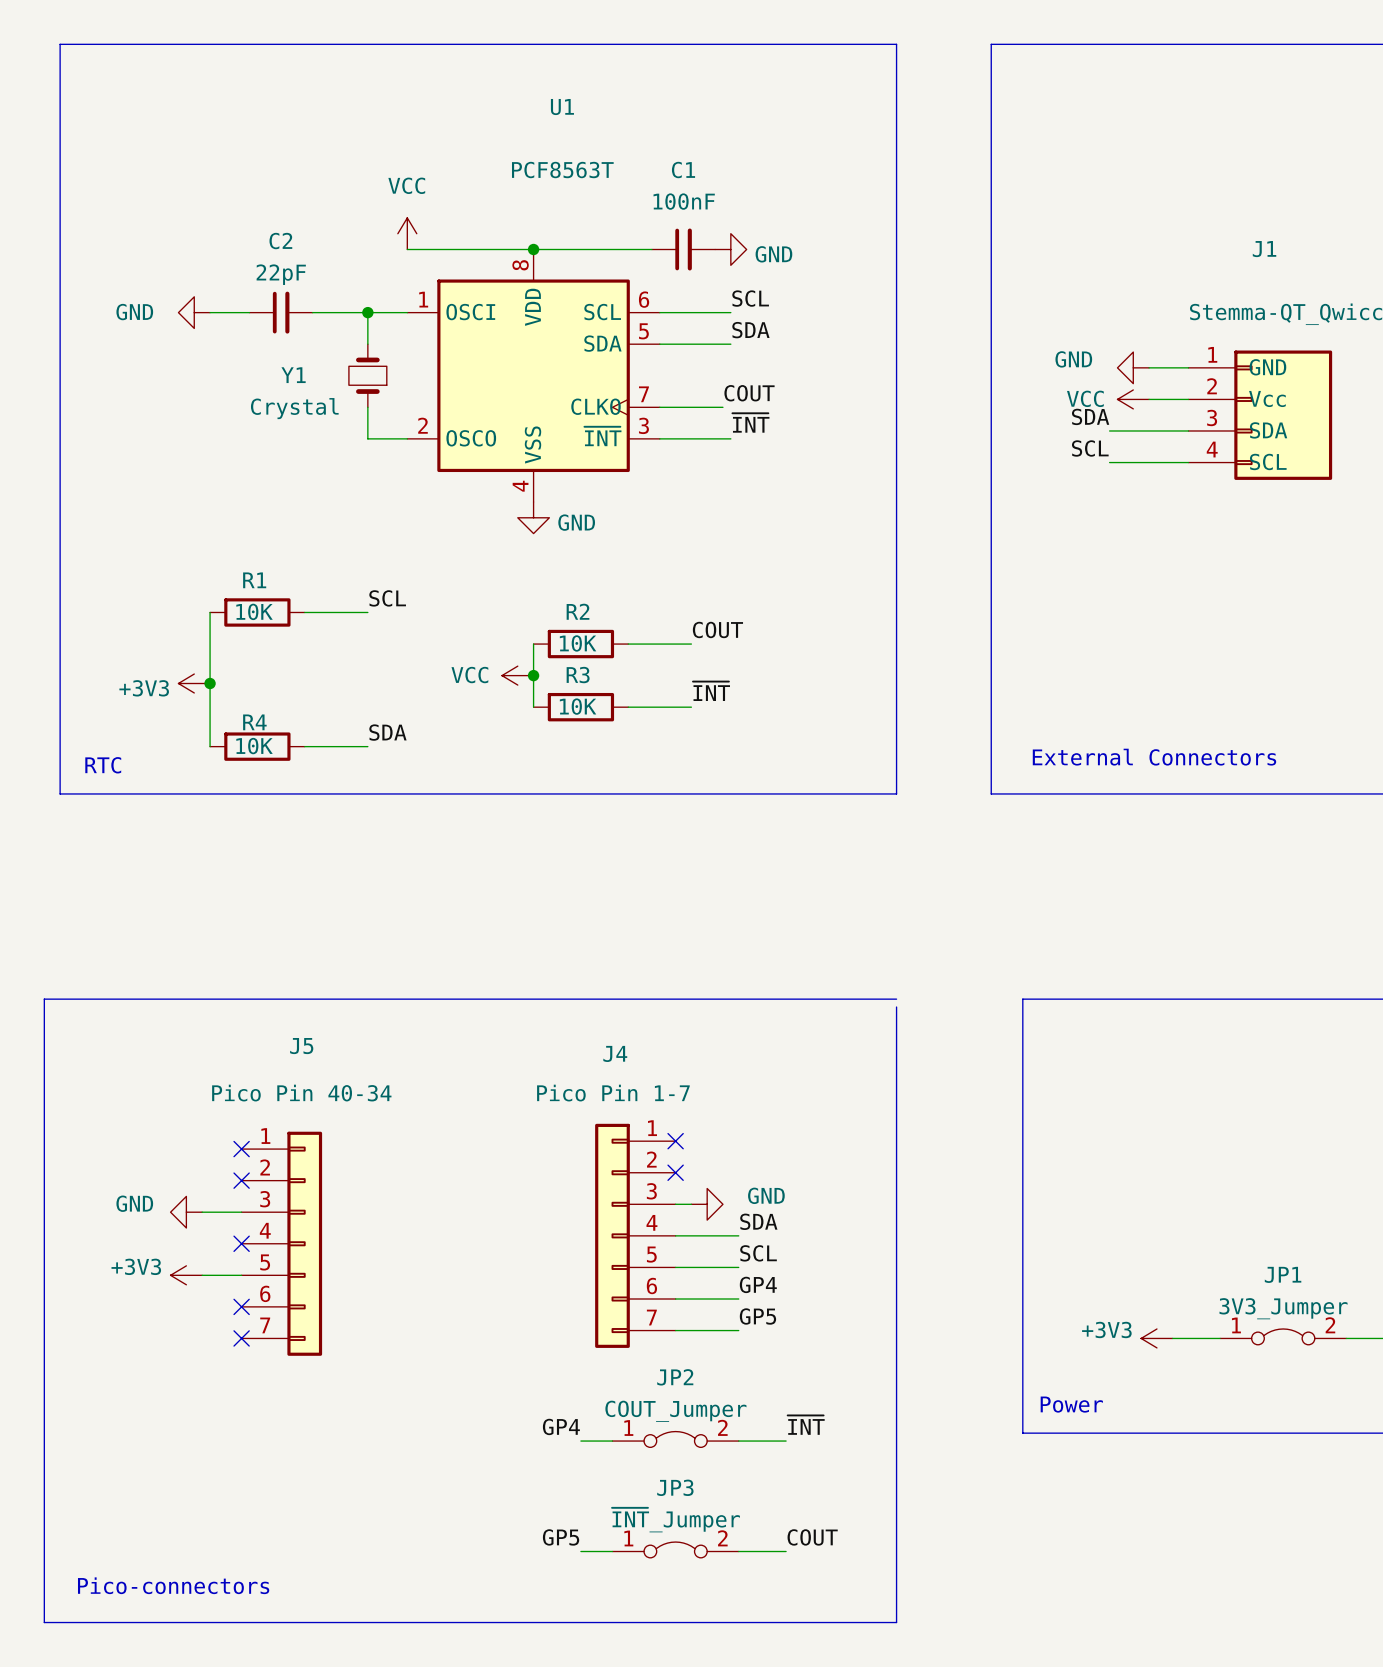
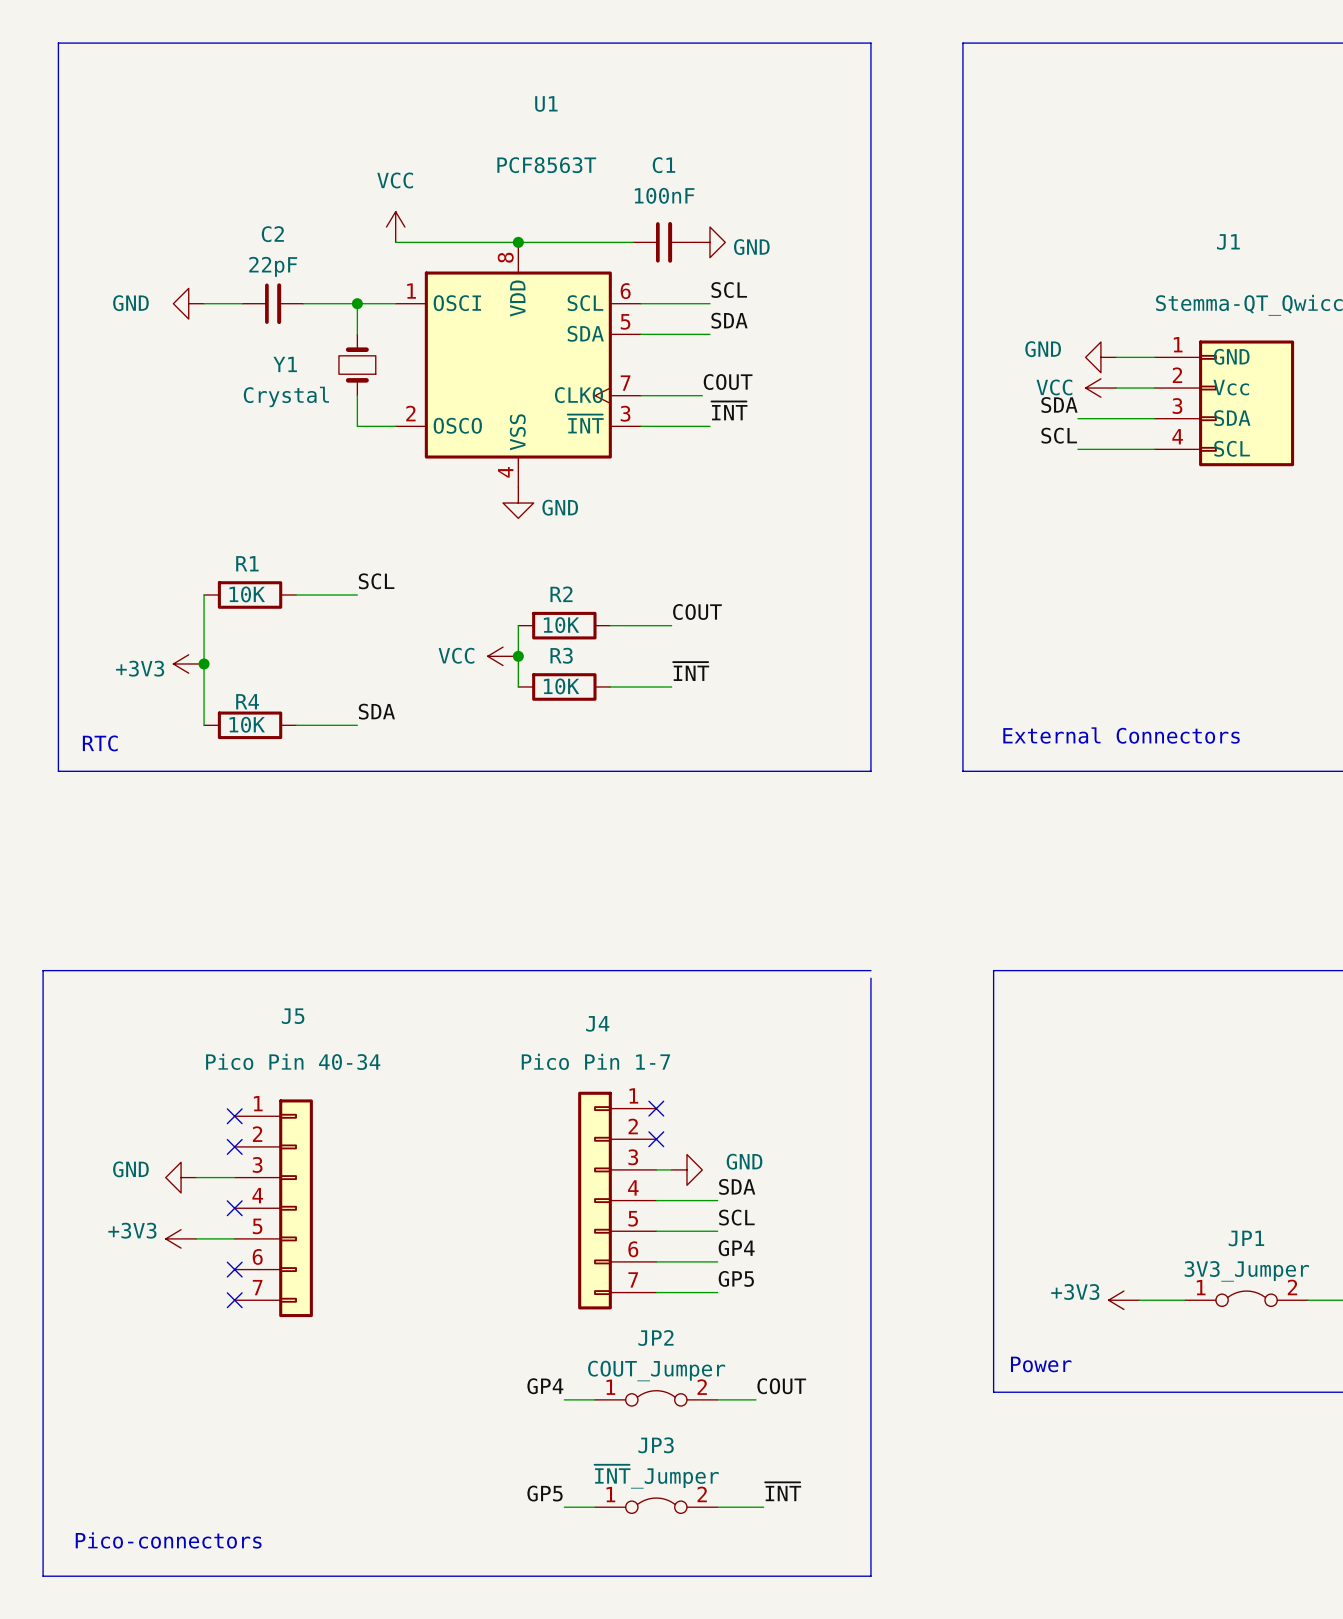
label: ~{INT} (806, 1425) -> COUT (781, 1386)
wire: (778, 1441) (786, 1441) -> none
label: COUT (812, 1537) -> ~{INT} (783, 1491)

